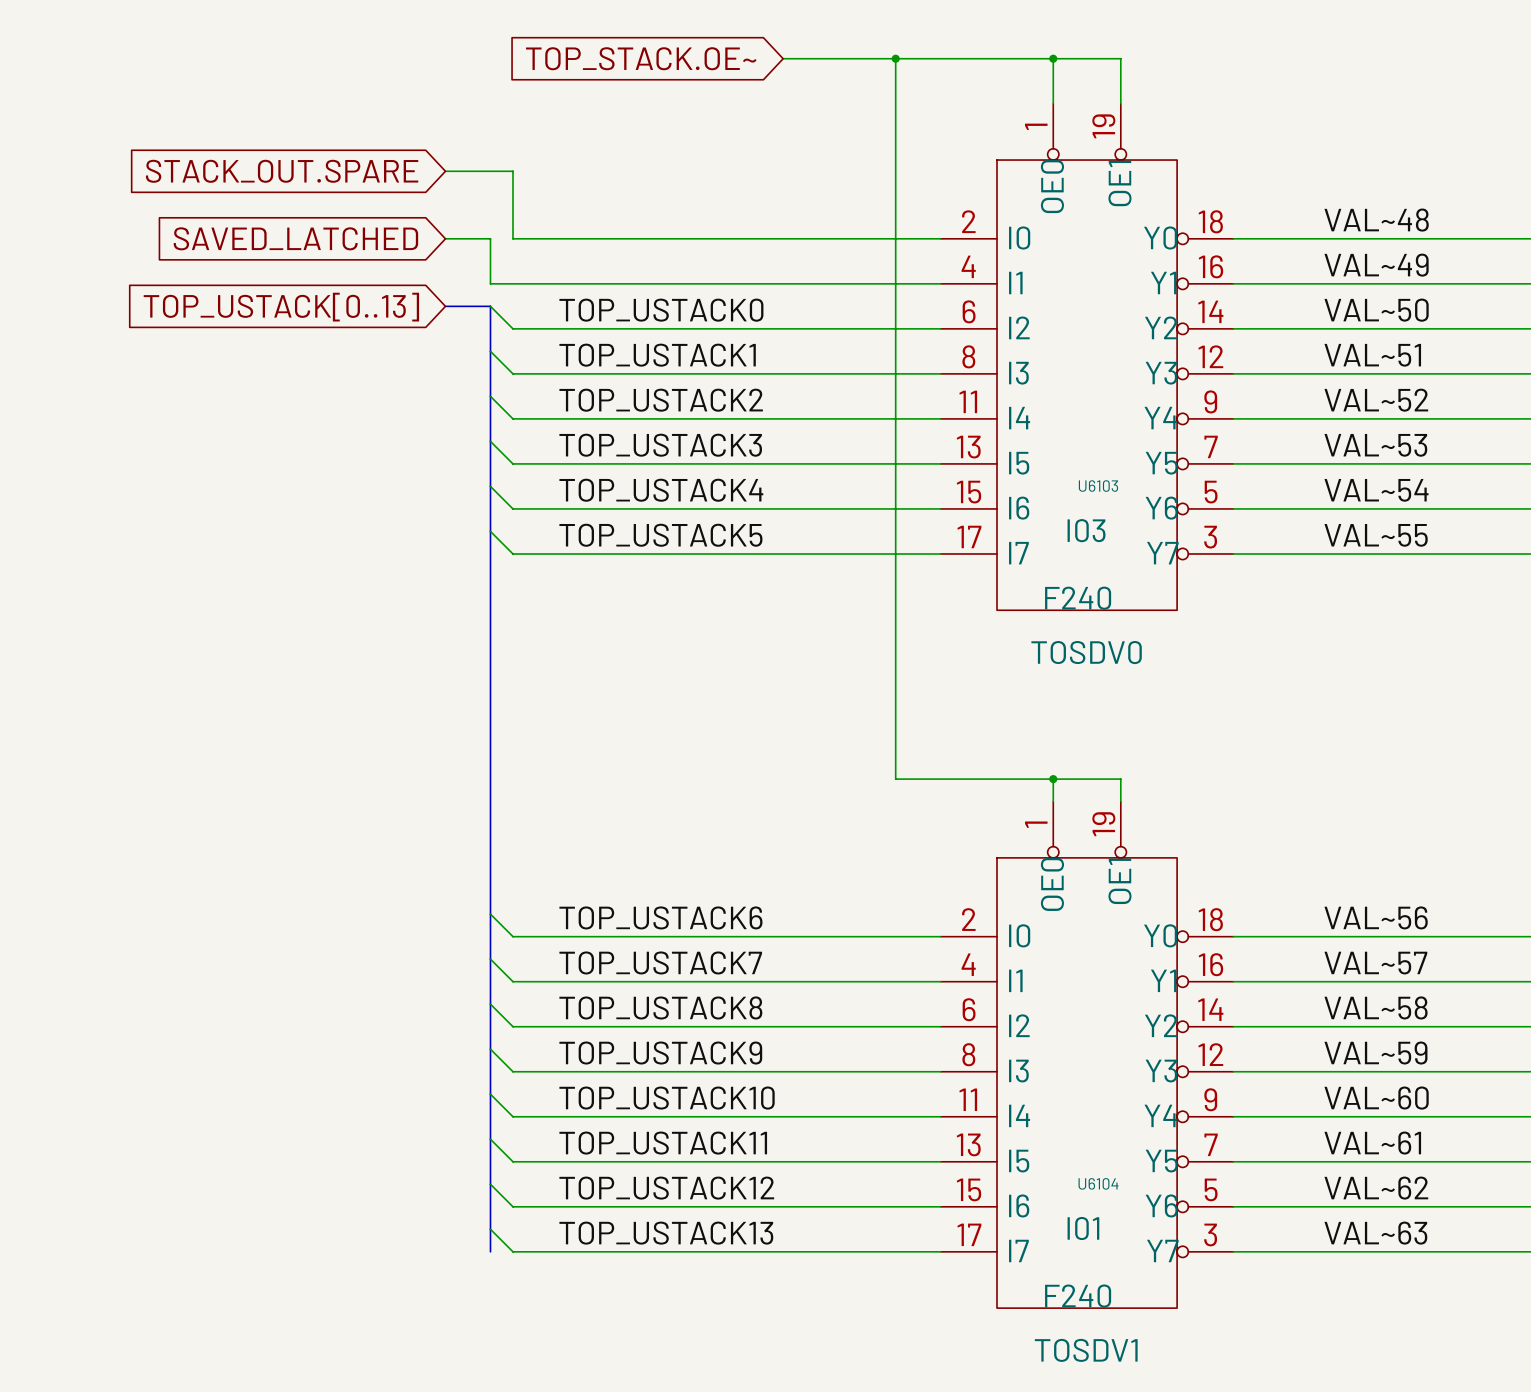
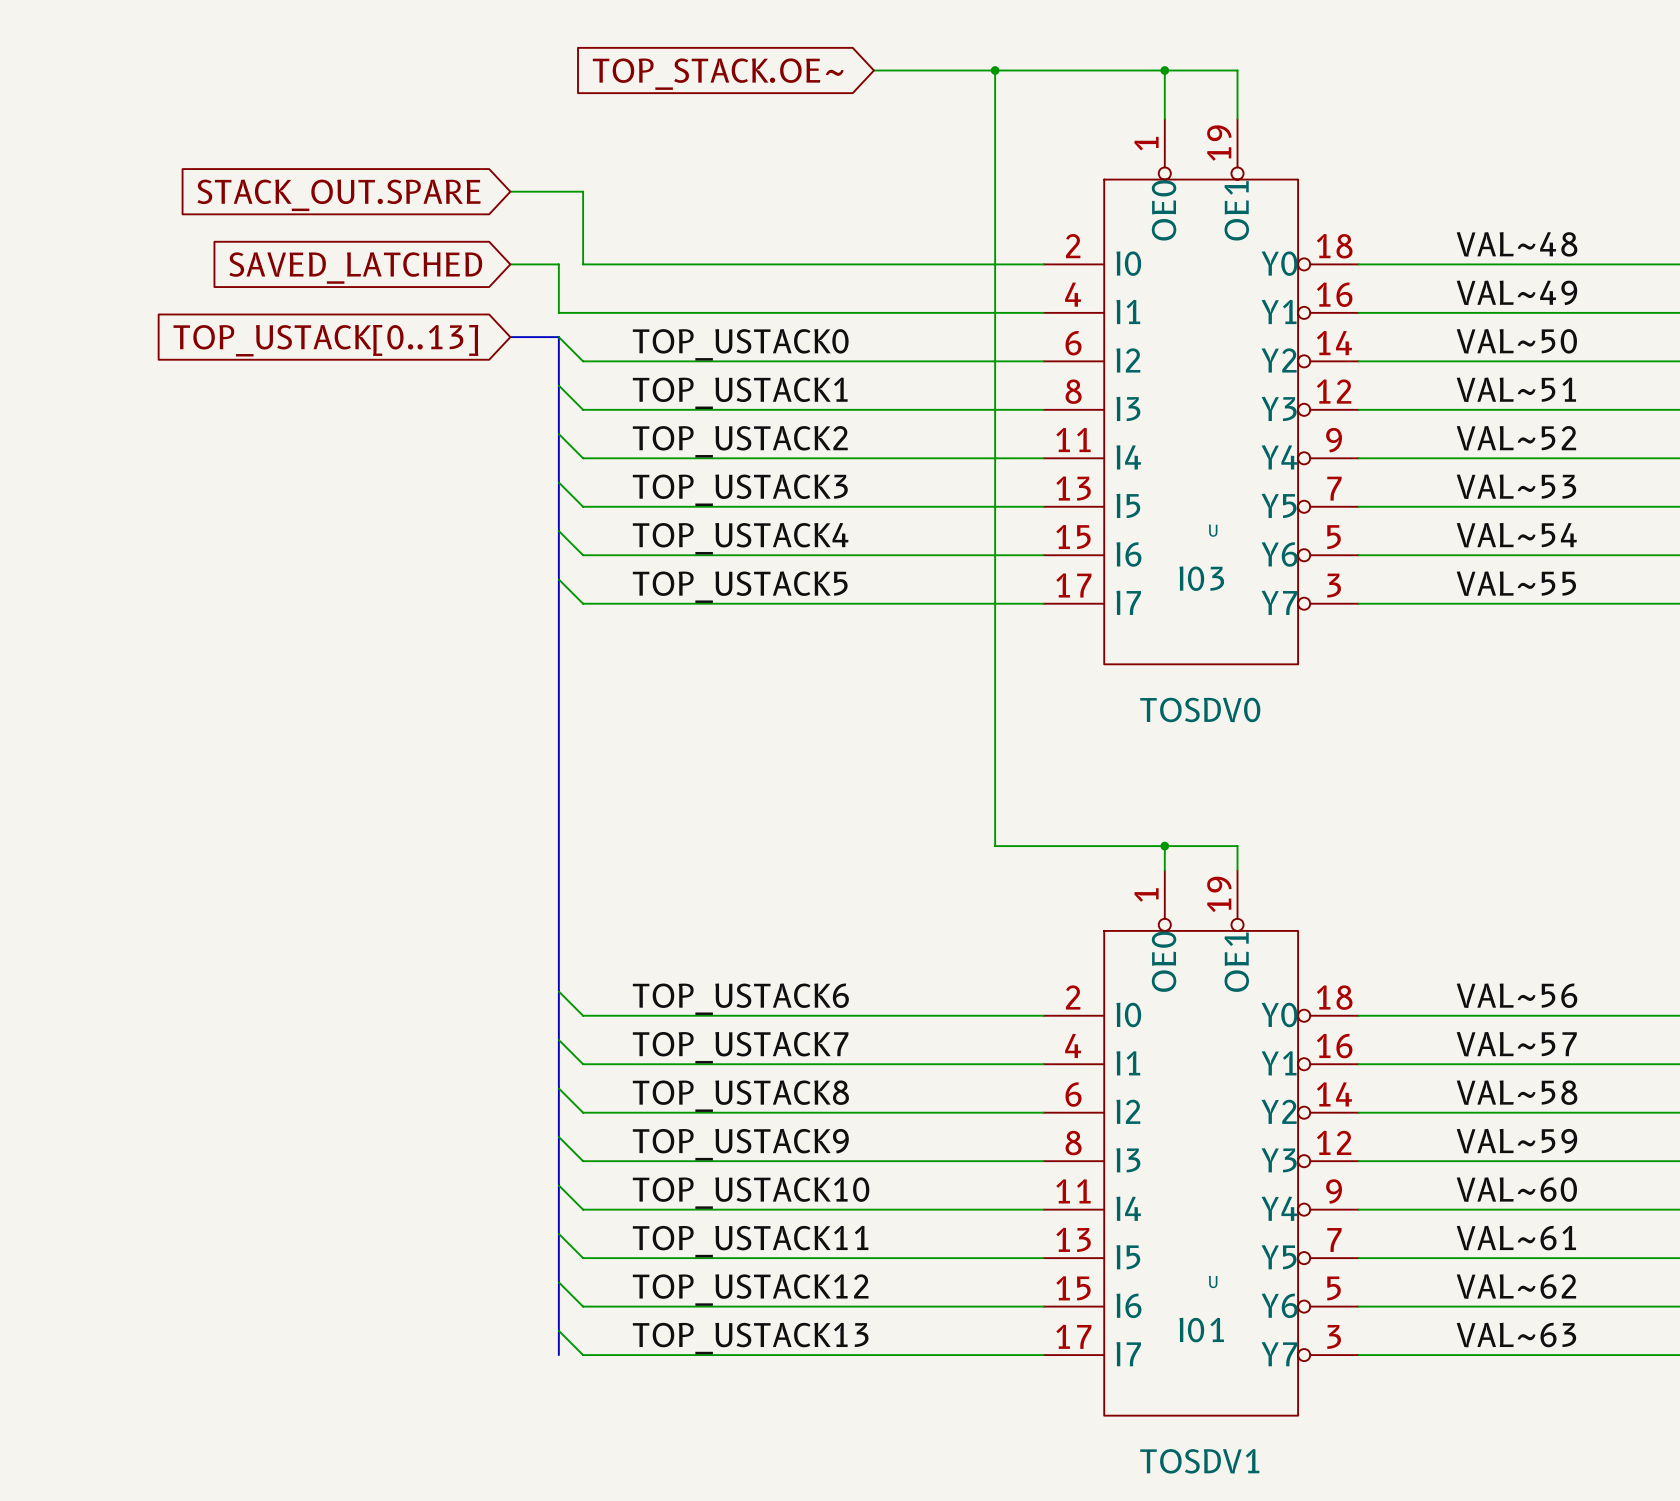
U6103 name: U6103 (1098, 486) -> U (1213, 530)
U6103 value: F240 (1078, 598) -> none
U6104 name: U6104 (1098, 1183) -> U (1213, 1281)
U6104 value: F240 (1078, 1296) -> none

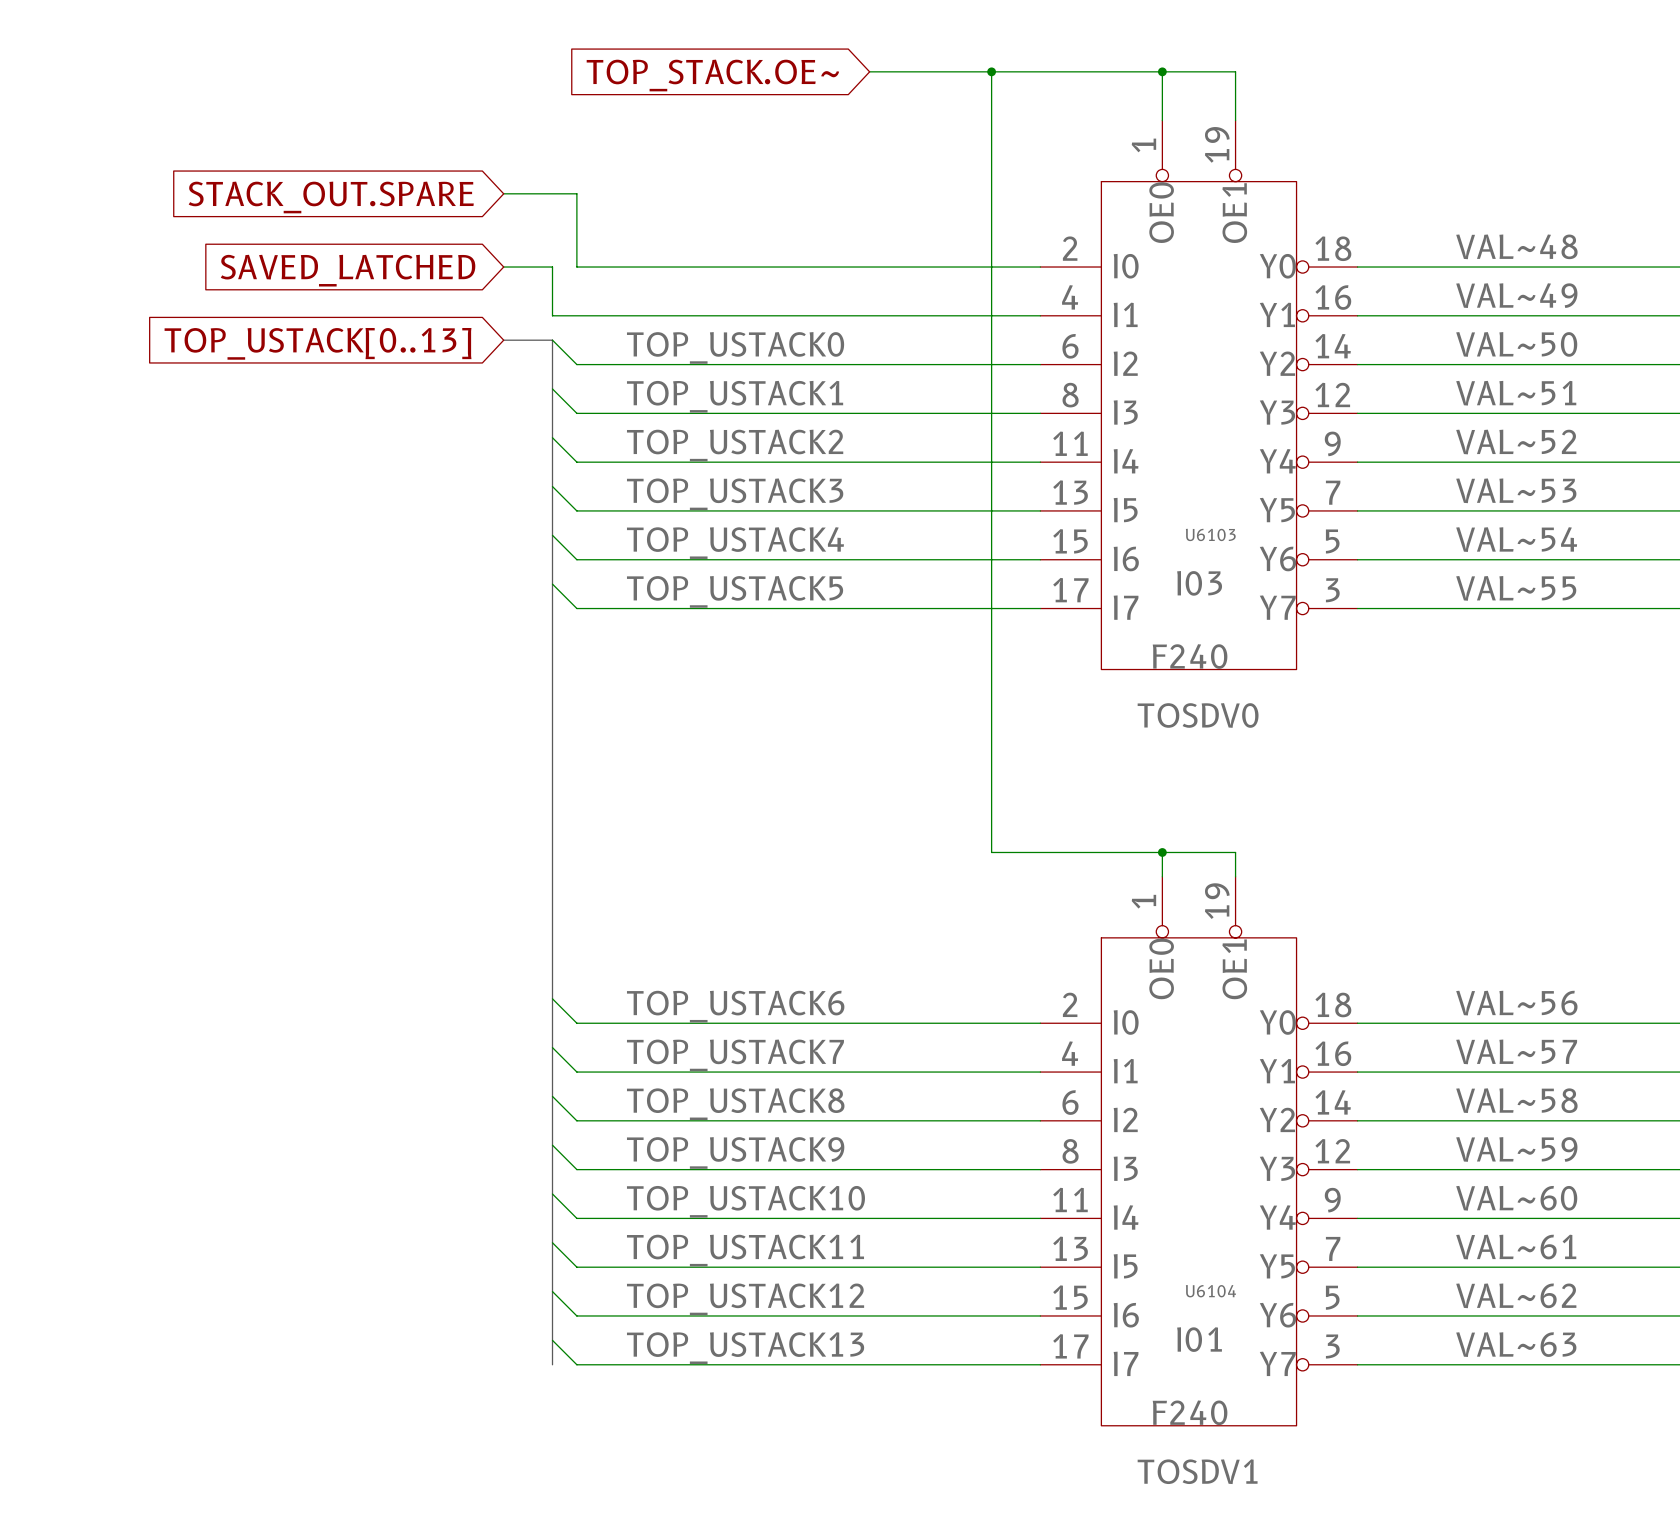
U name: U (1213, 530) -> U6103 (1210, 534)
U value: none -> F240 (1190, 656)
U name: U (1213, 1281) -> U6104 (1210, 1291)
U value: none -> F240 (1190, 1412)

